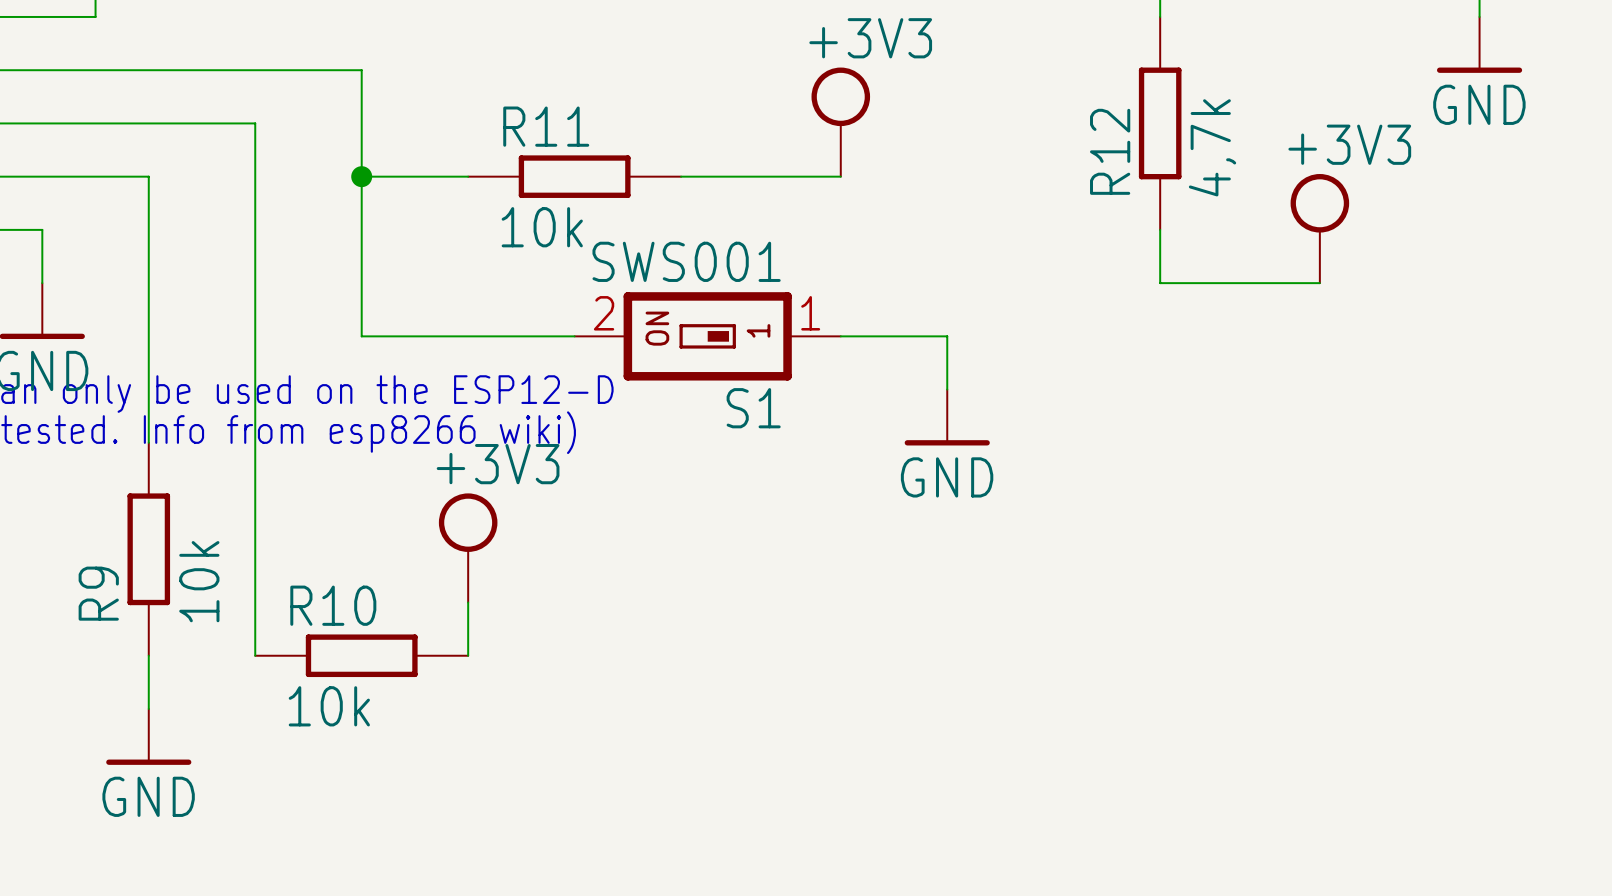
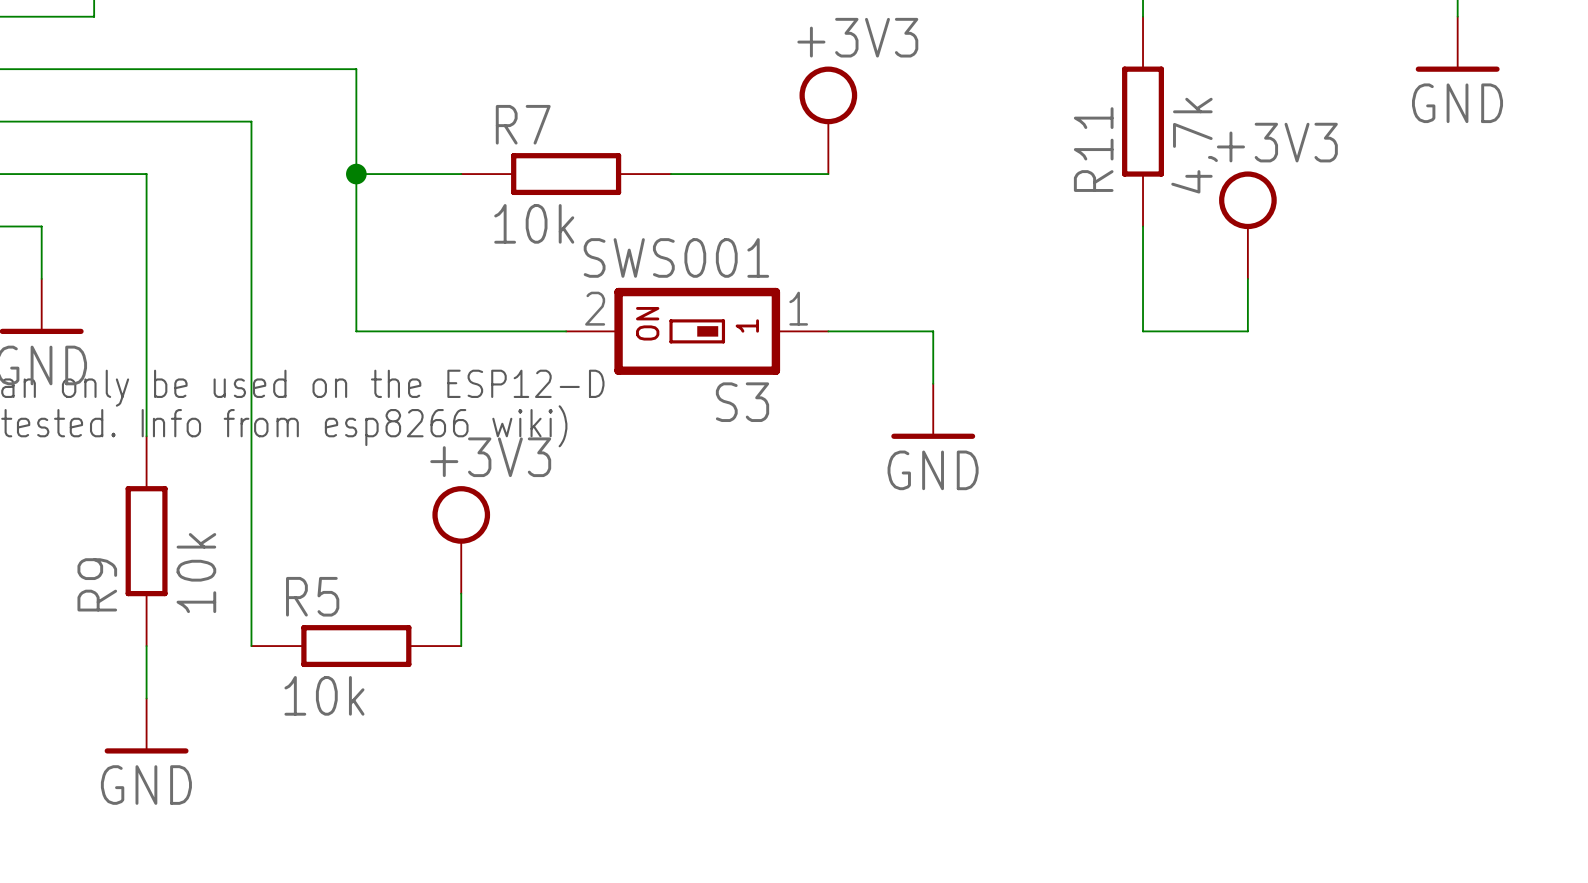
R11 name: R11 (546, 126) -> R7 (523, 124)
R12 name: R12 (1110, 151) -> R11 (1093, 149)
power symbol position: +3V3 (1319, 228) -> +3V3 (1247, 225)
wire: (1160, 283) (1319, 283) -> (1143, 278) (1143, 331) (1247, 331) (1247, 278)
S1 name: S1 (753, 408) -> S3 (742, 402)
R10 name: R10 (333, 605) -> R5 (312, 596)

